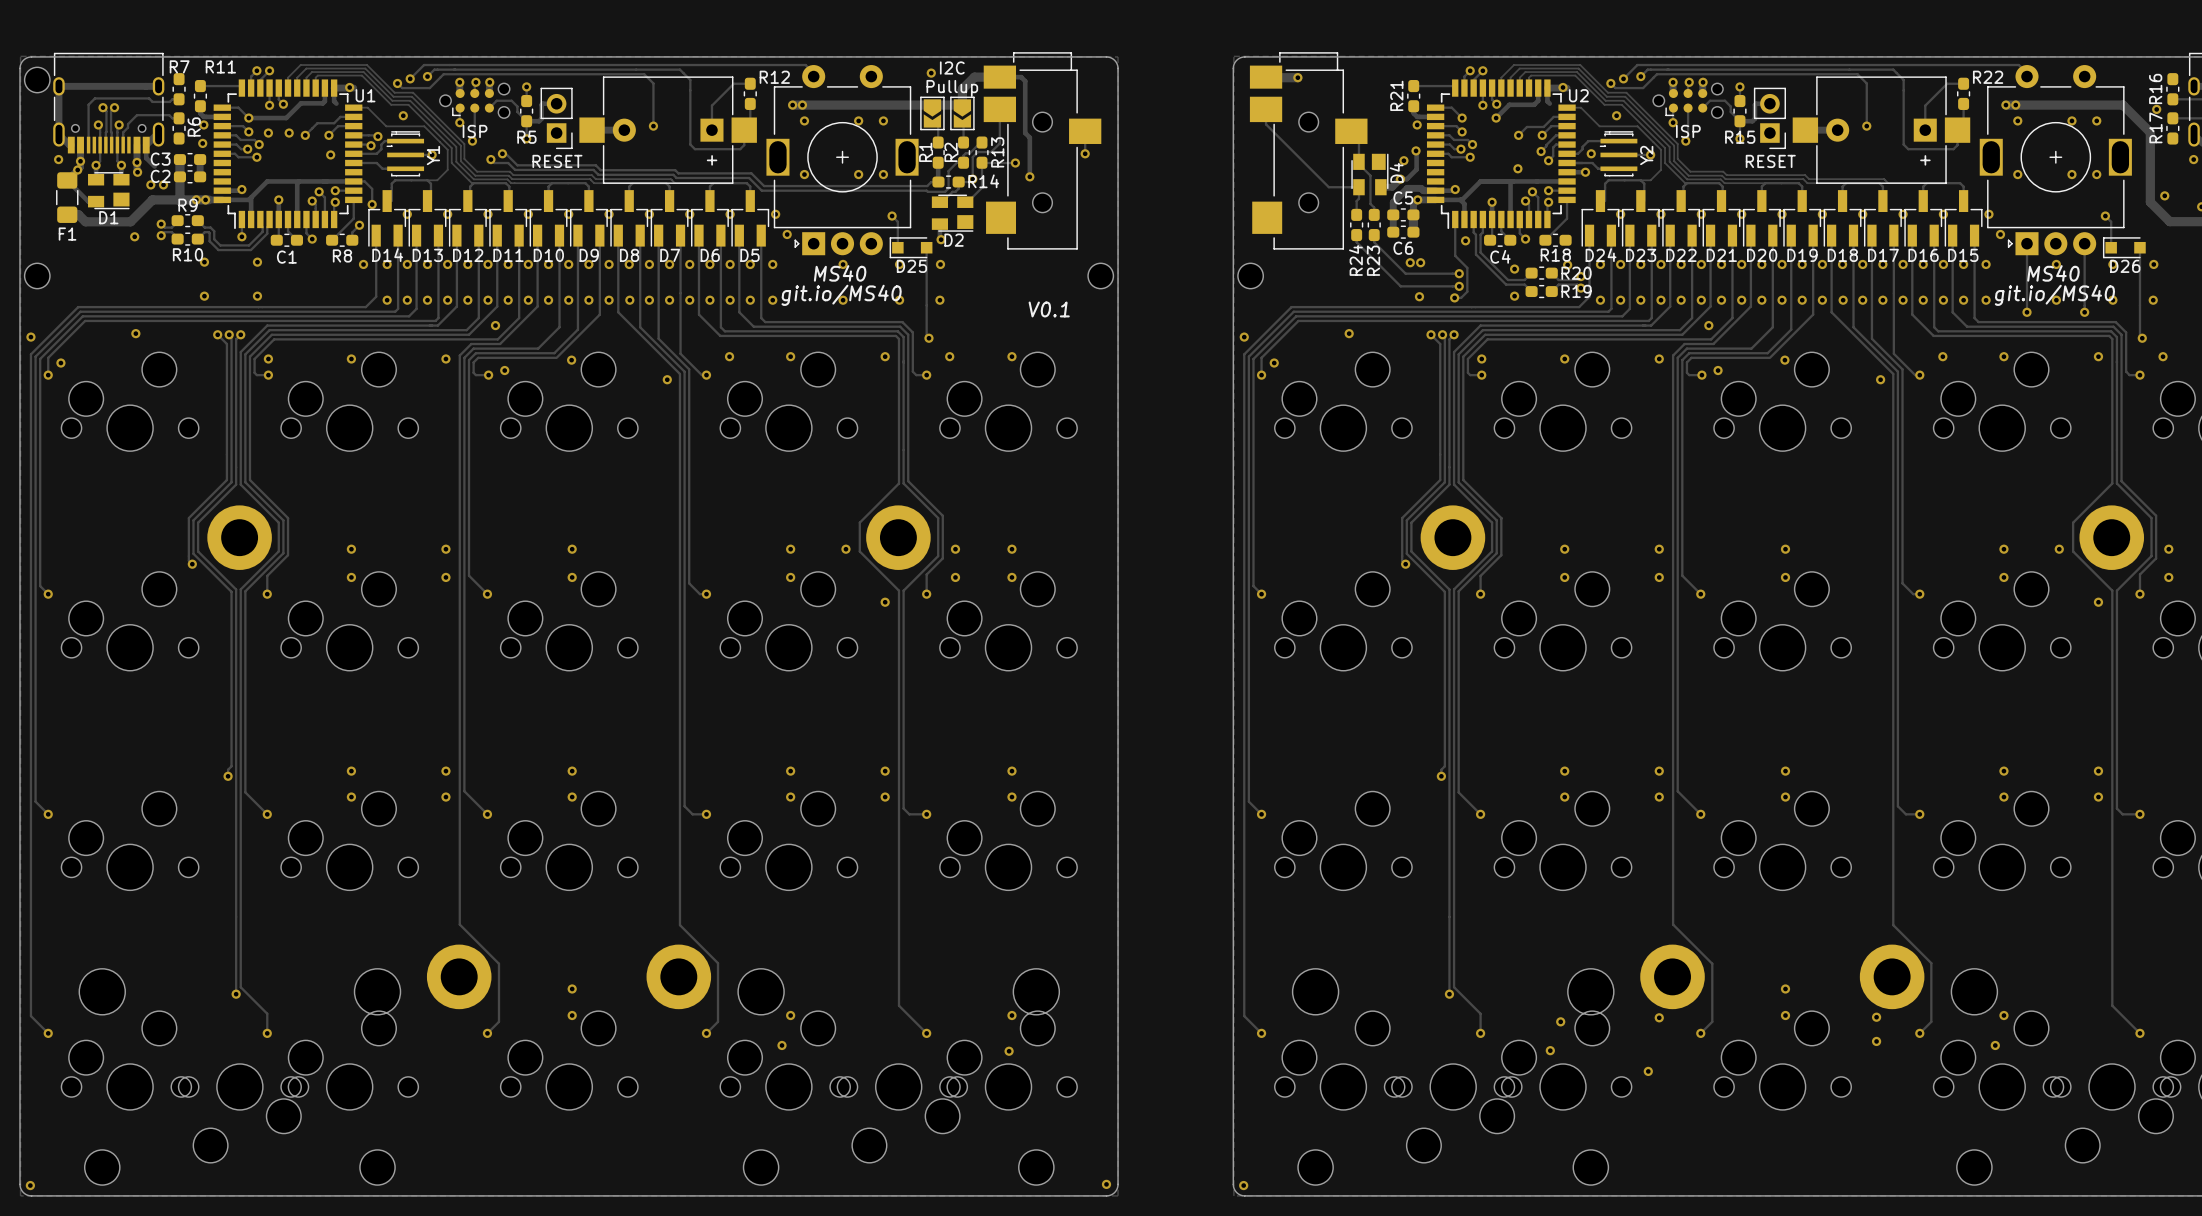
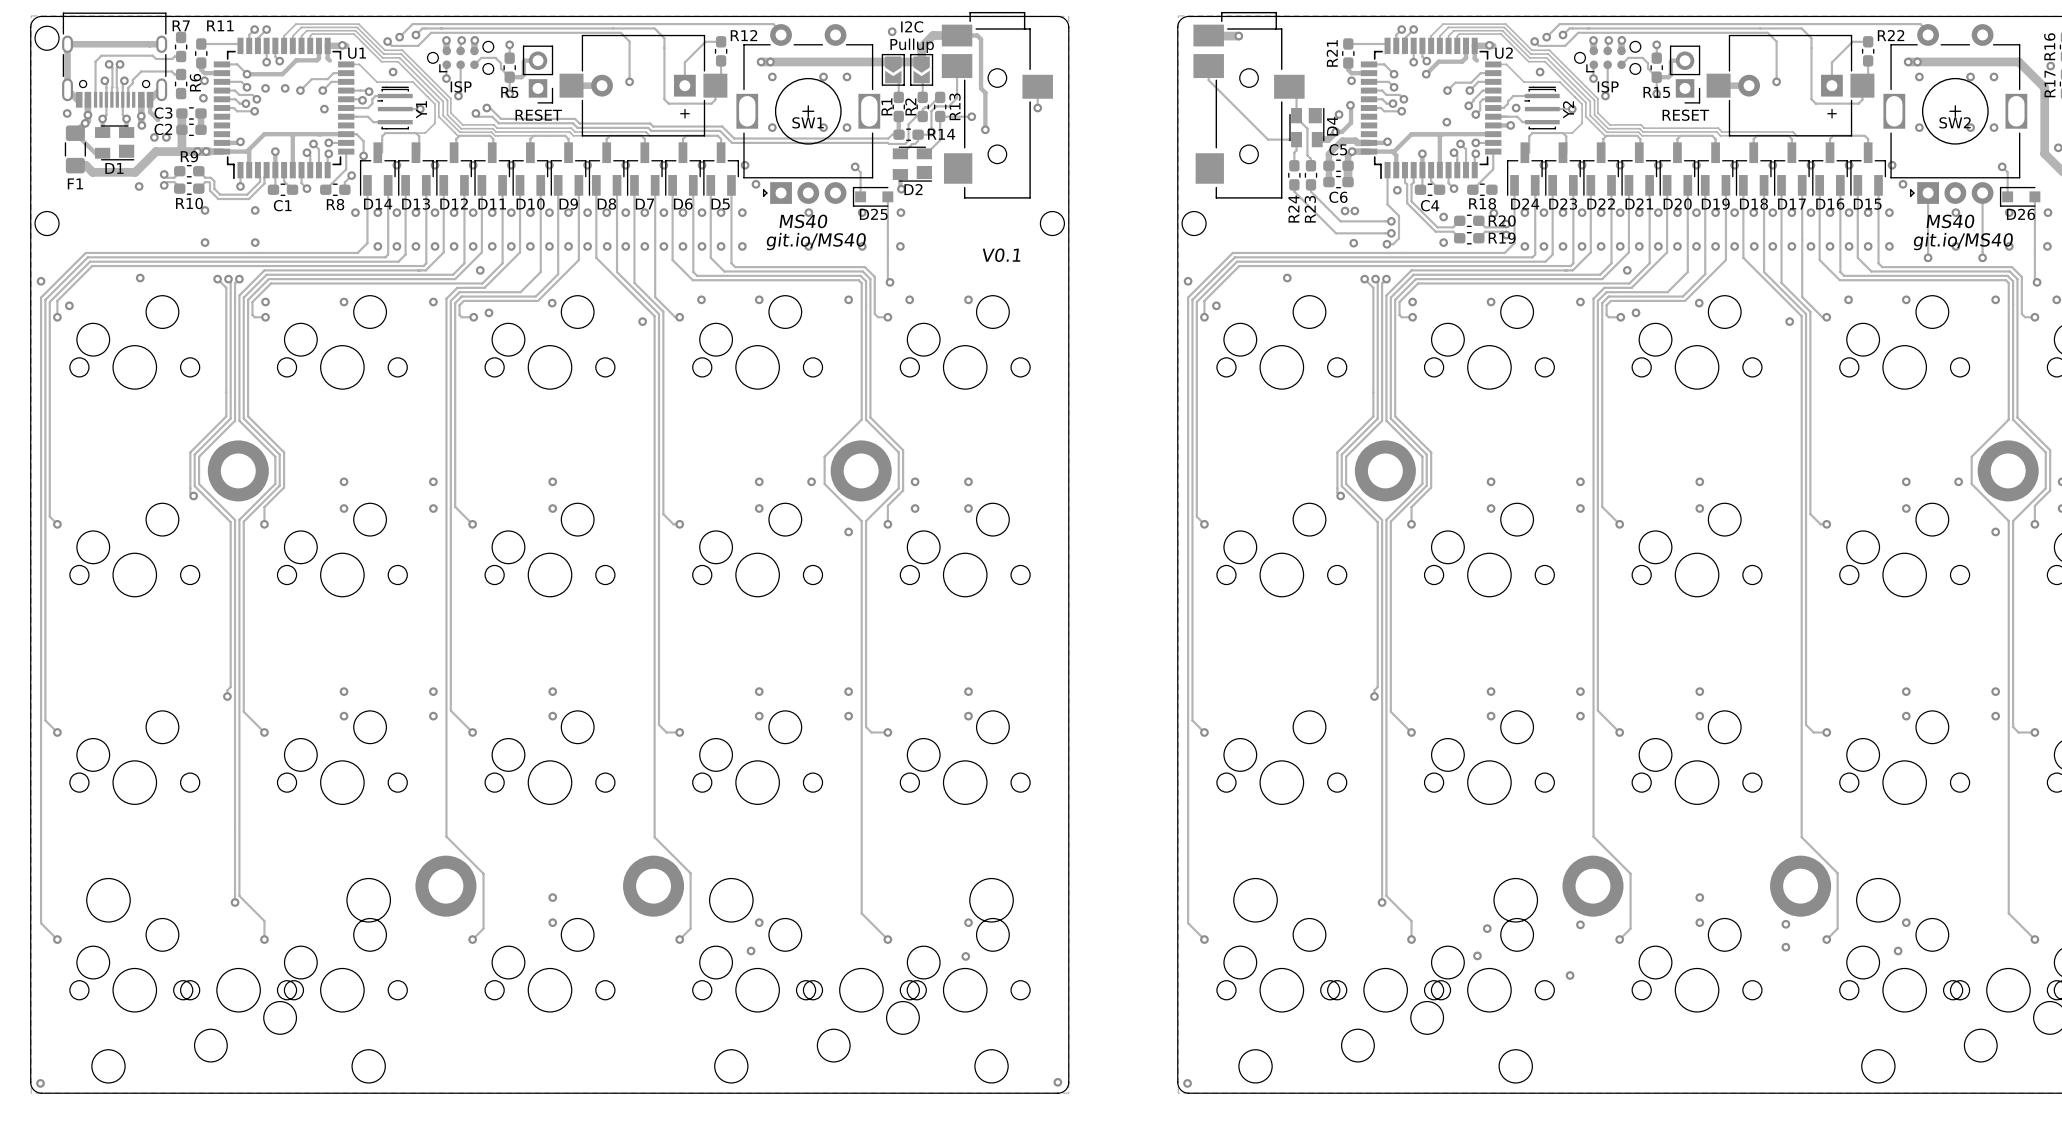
SW1 name: none -> SW1 (808, 122)
SW2 name: none -> SW2 (1955, 122)

